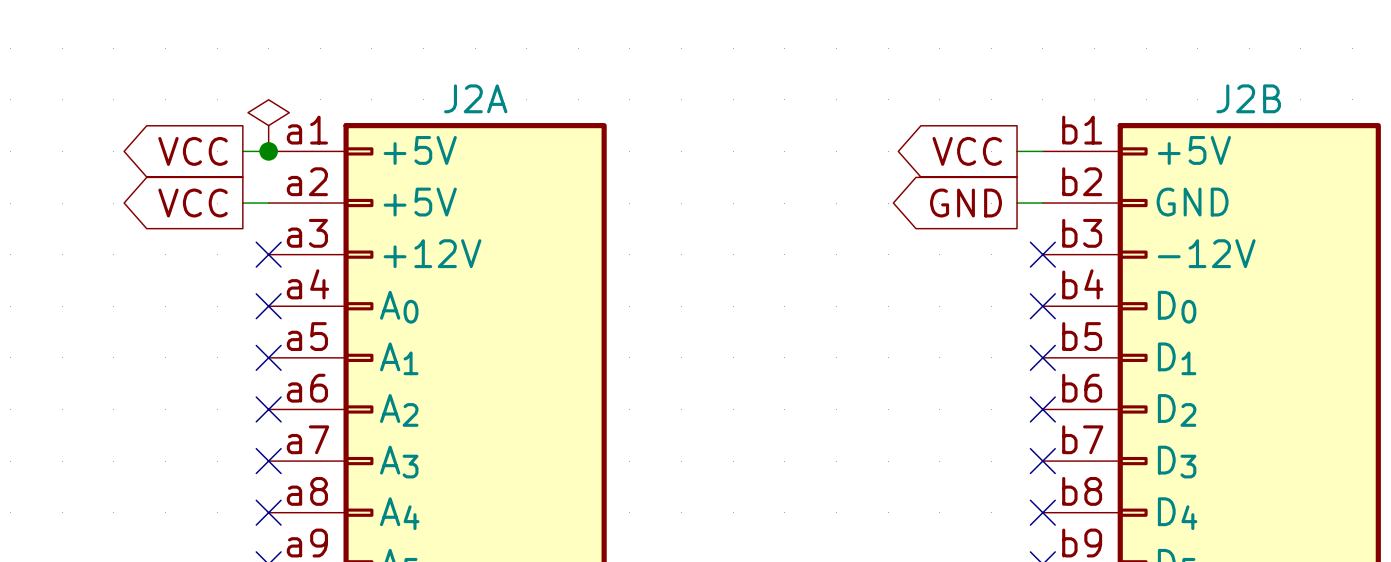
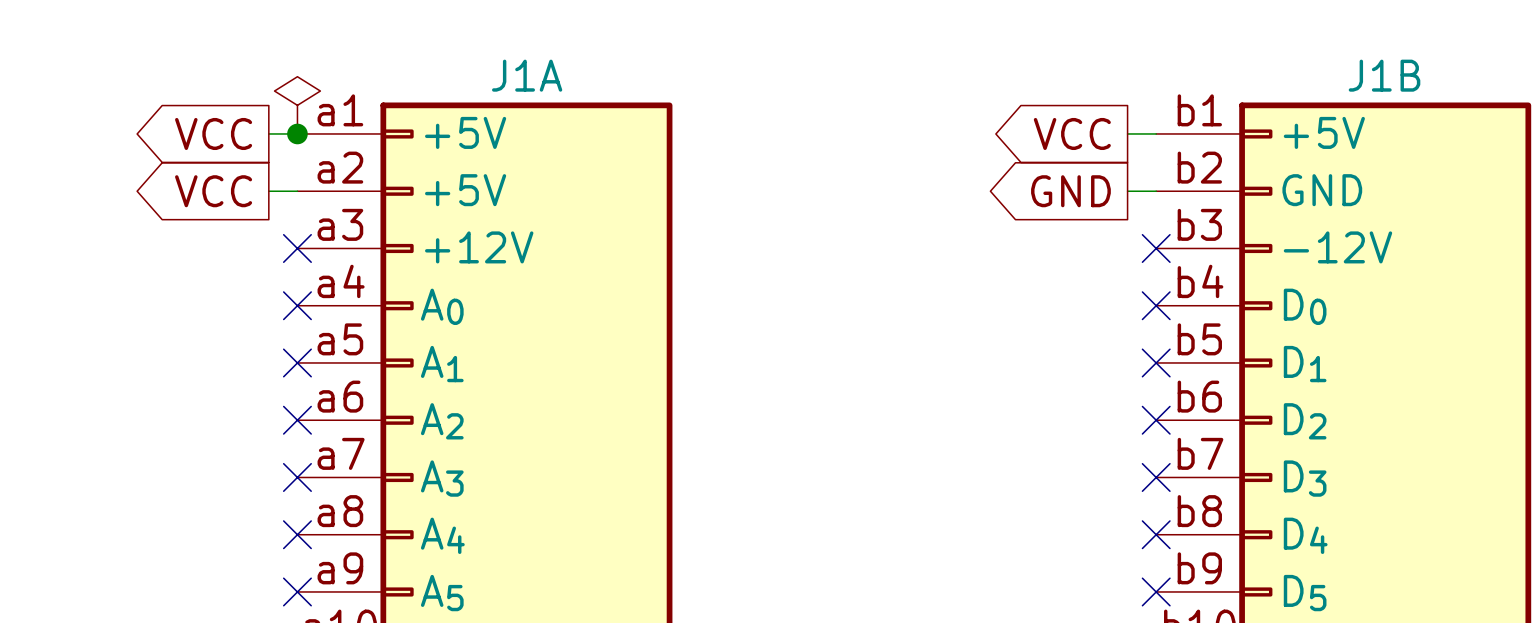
J2A name: J2A (475, 98) -> J1A (527, 75)
J2B name: J2B (1248, 98) -> J1B (1384, 75)

